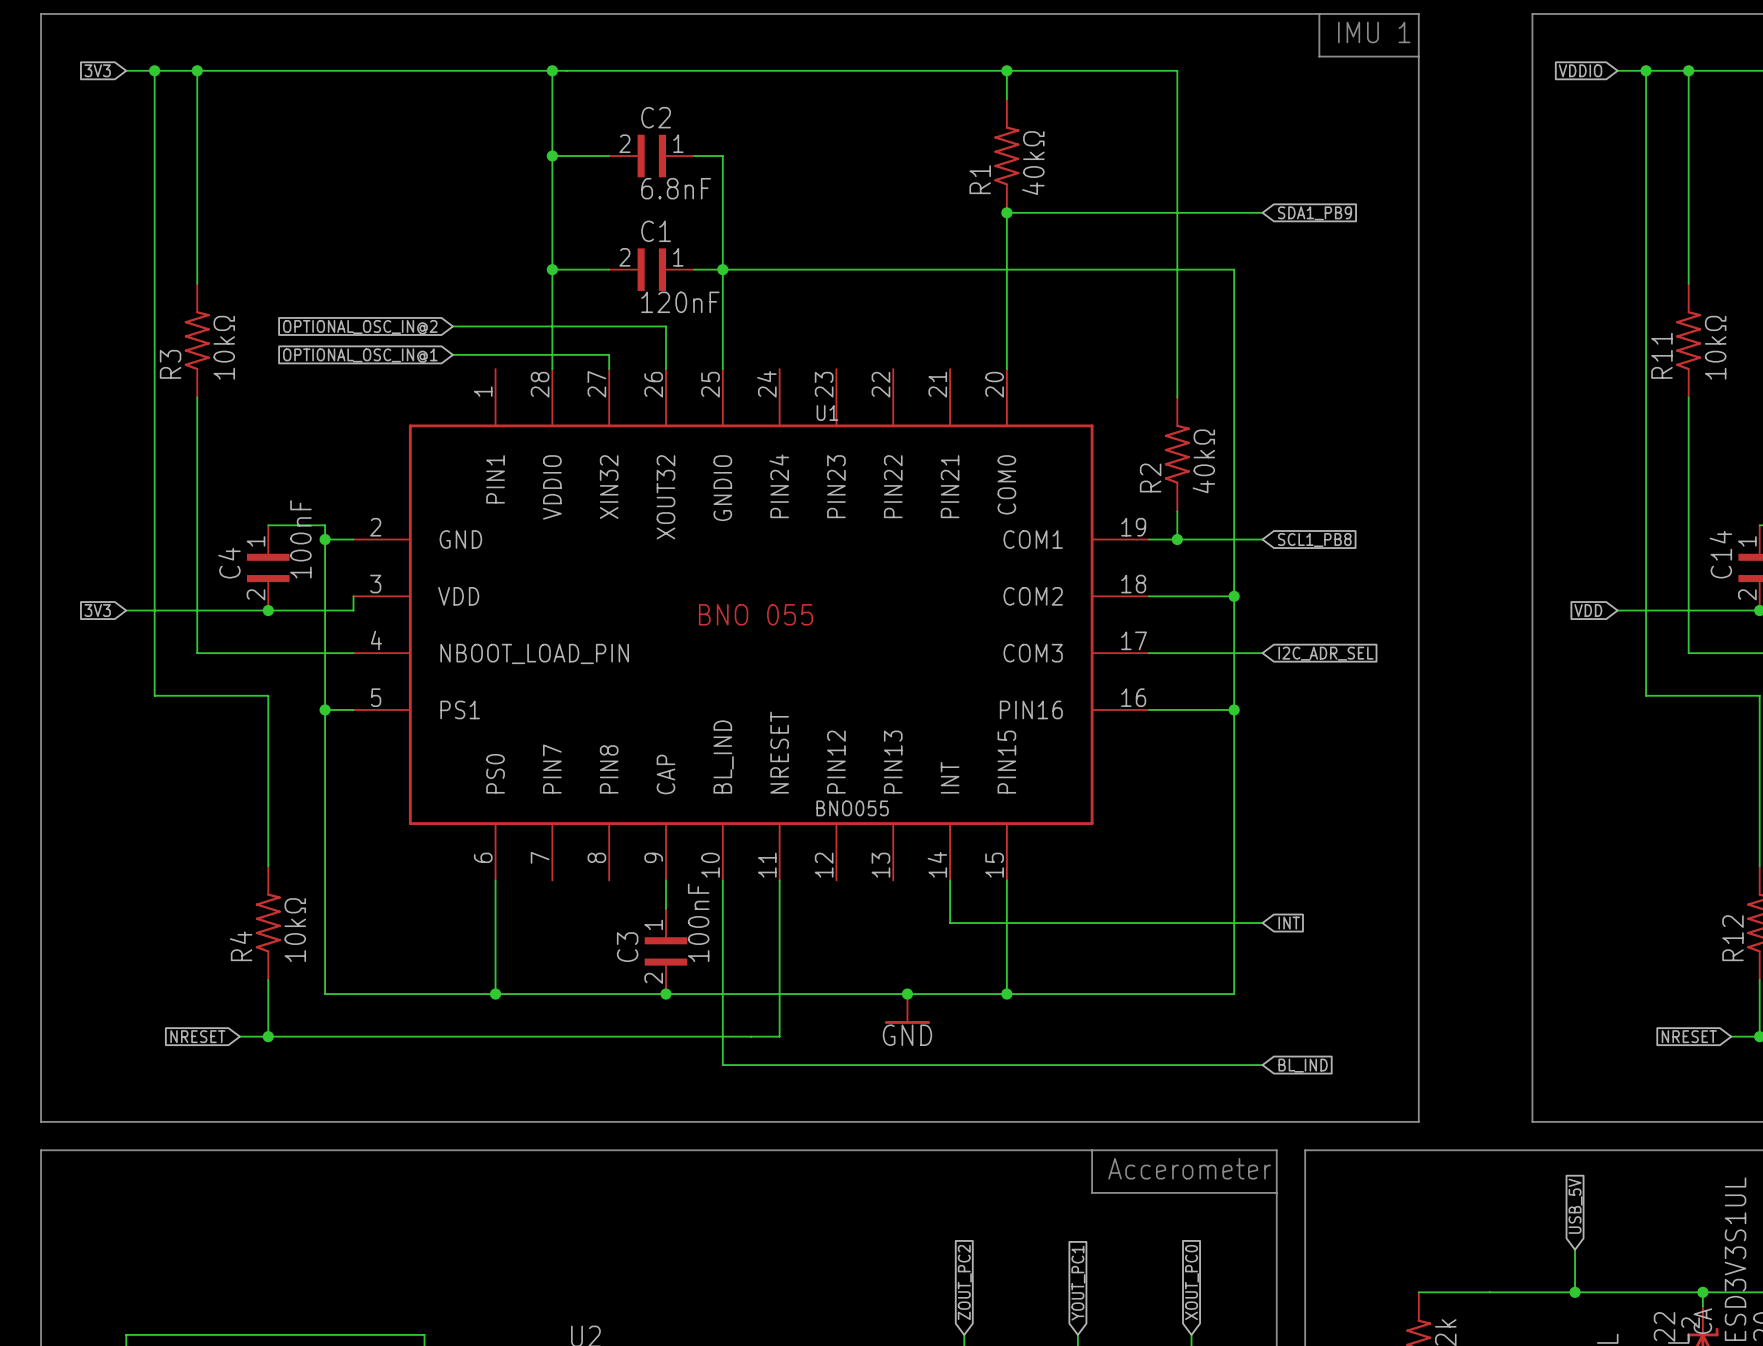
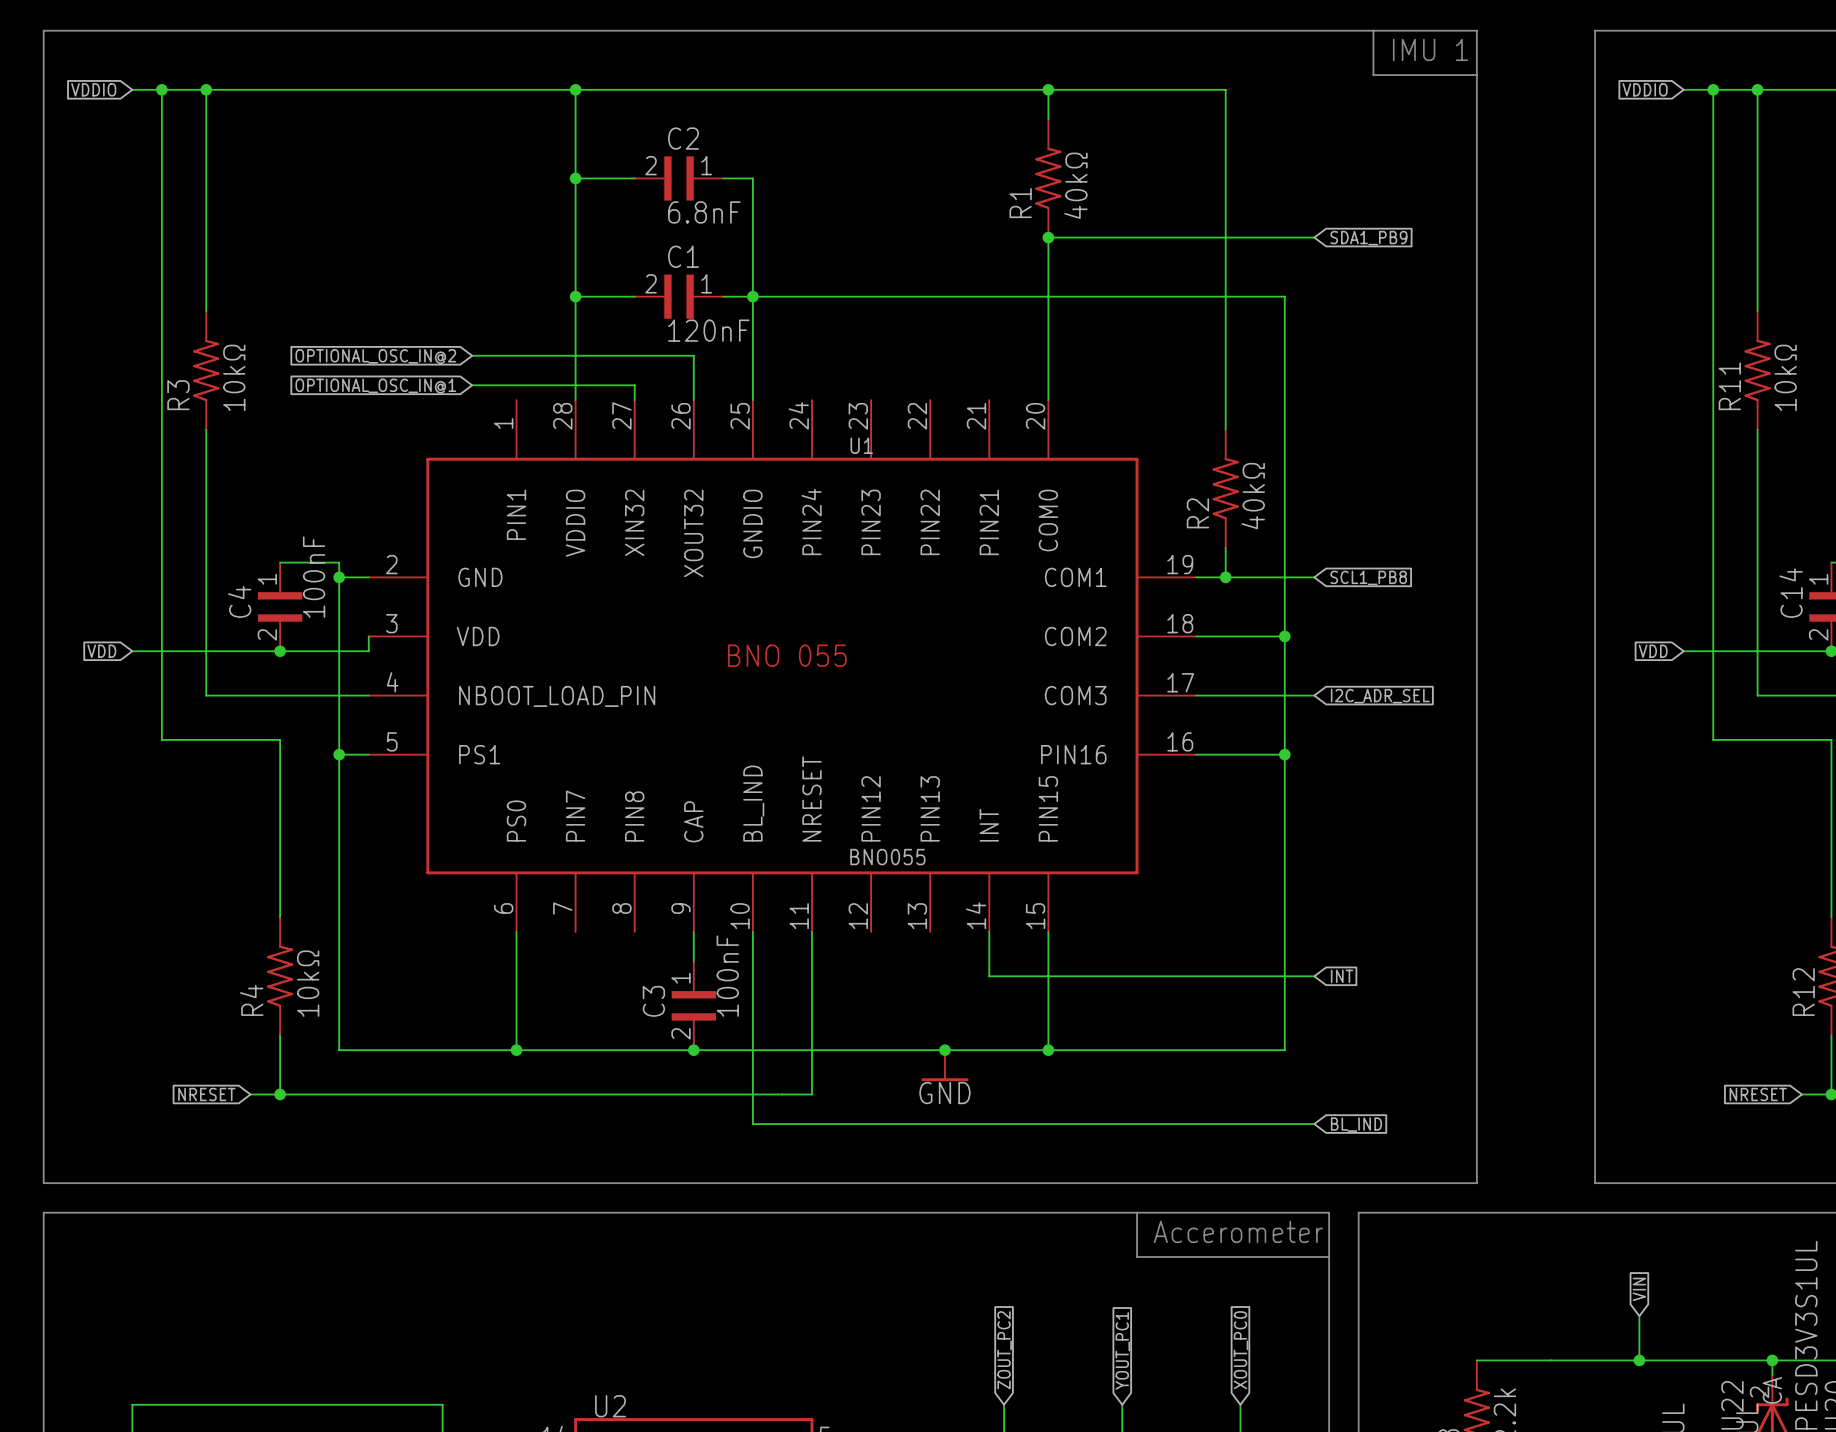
global label: 3V3 (97, 70) -> VDDIO (93, 89)
global label: 3V3 (97, 610) -> VDD (101, 651)
global label: USB_5V (1575, 1206) -> VIN (1639, 1289)

